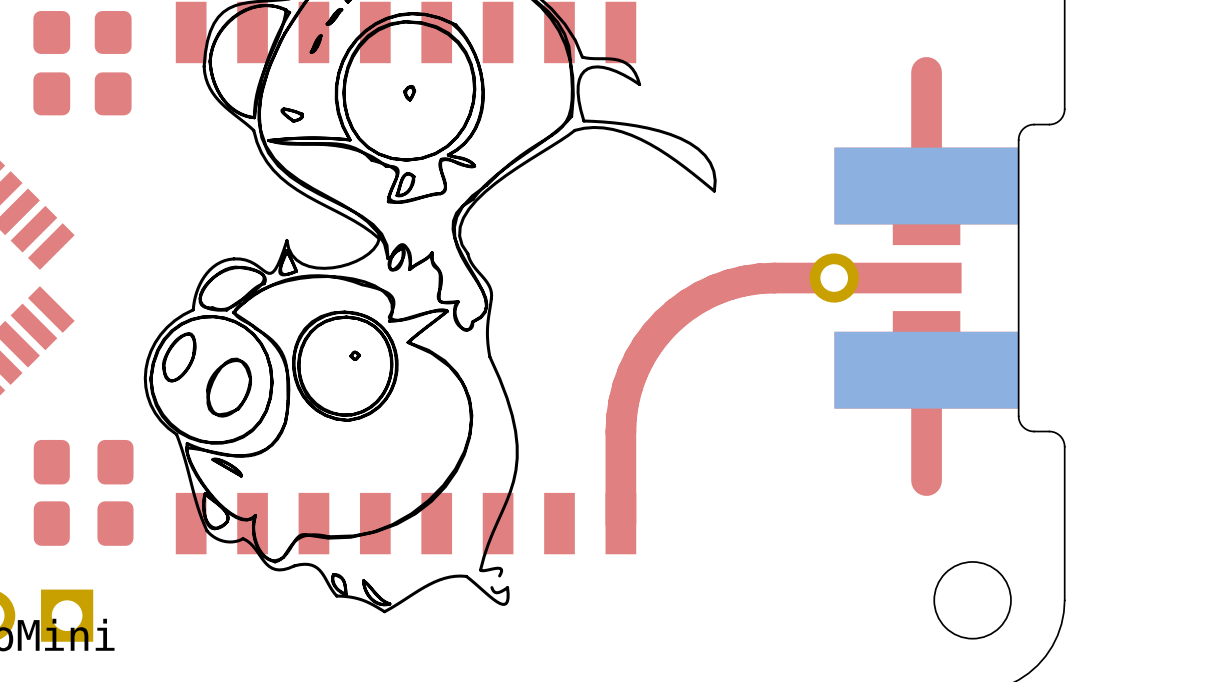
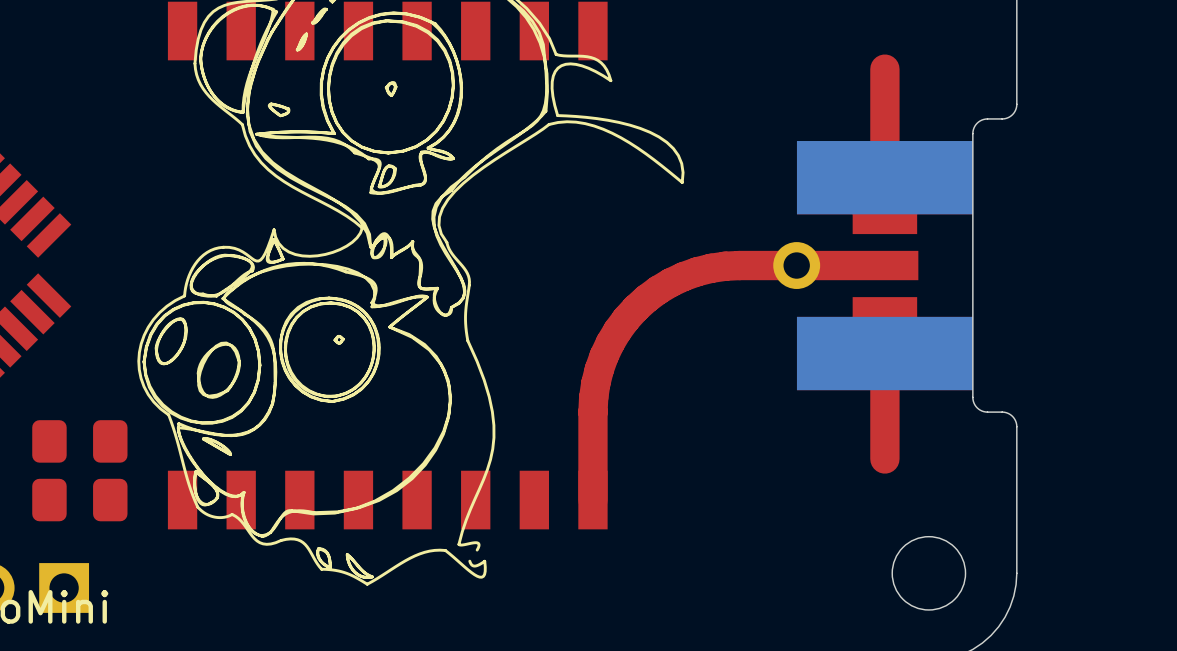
part: (82, 32) -> none
part: (82, 93) -> none

